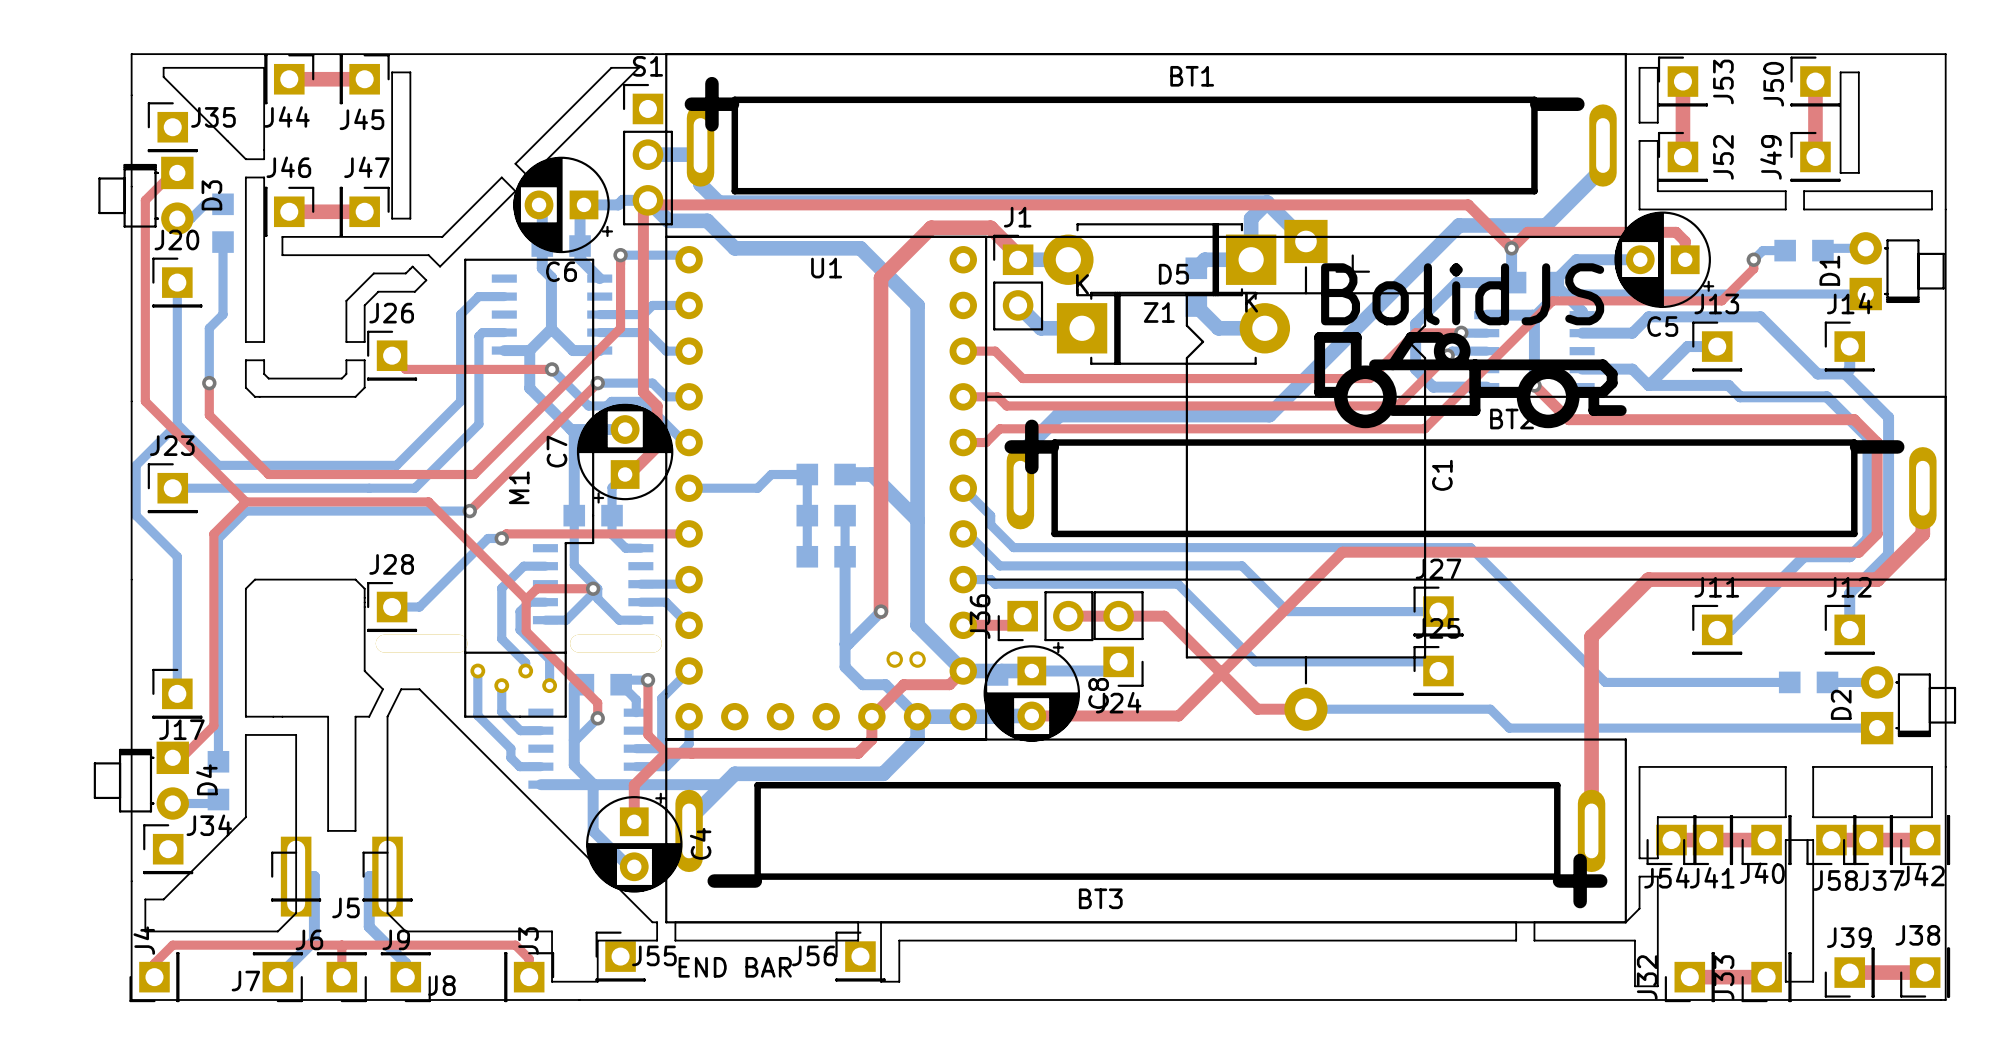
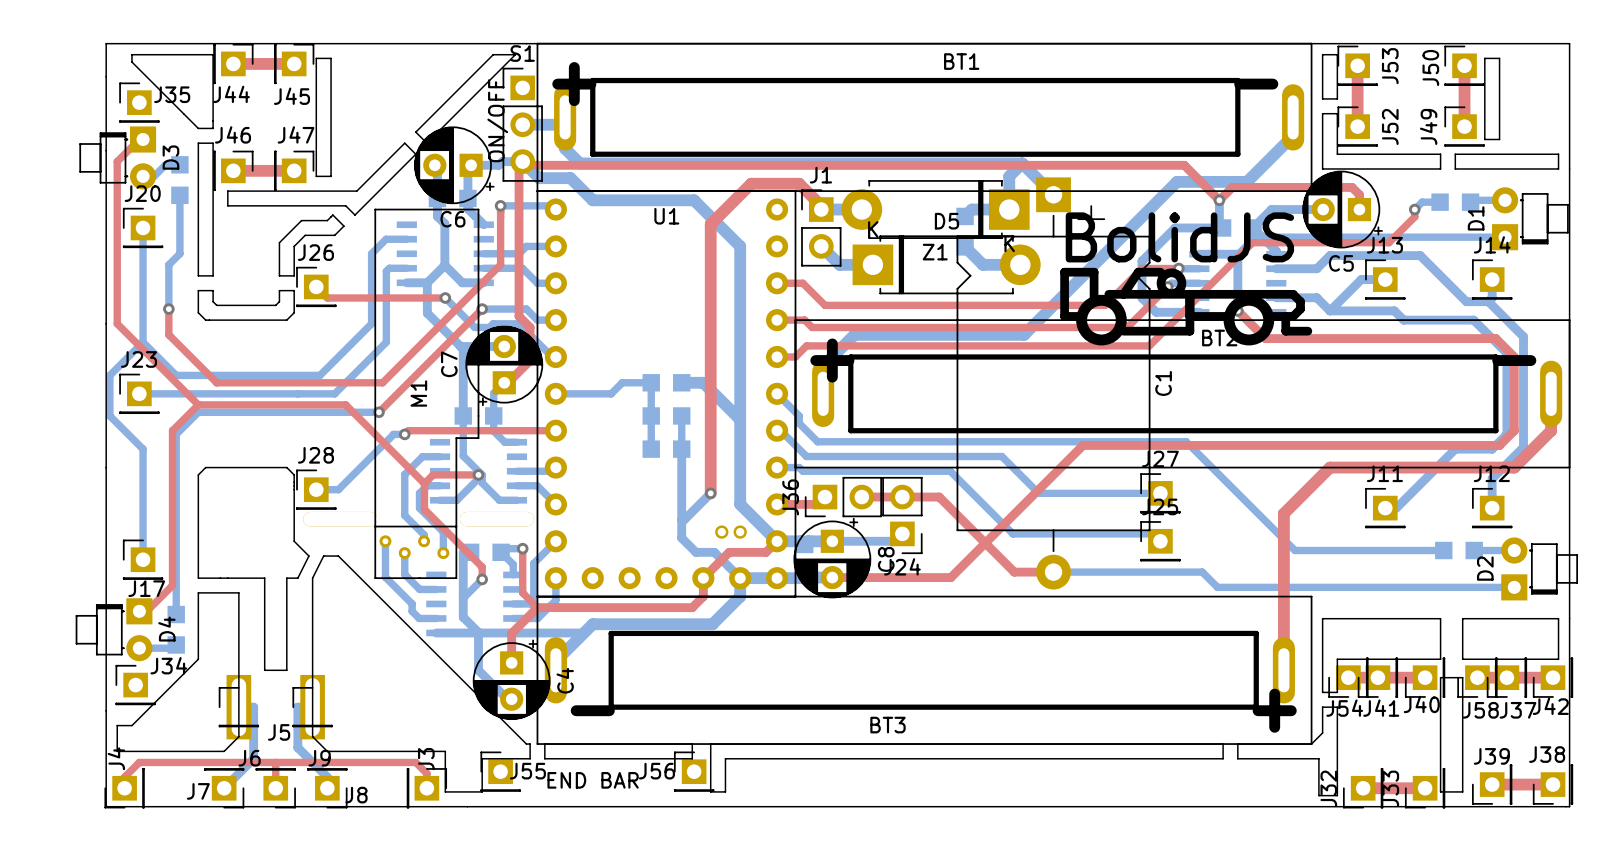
text: none -> ON/OFF (497, 120)

